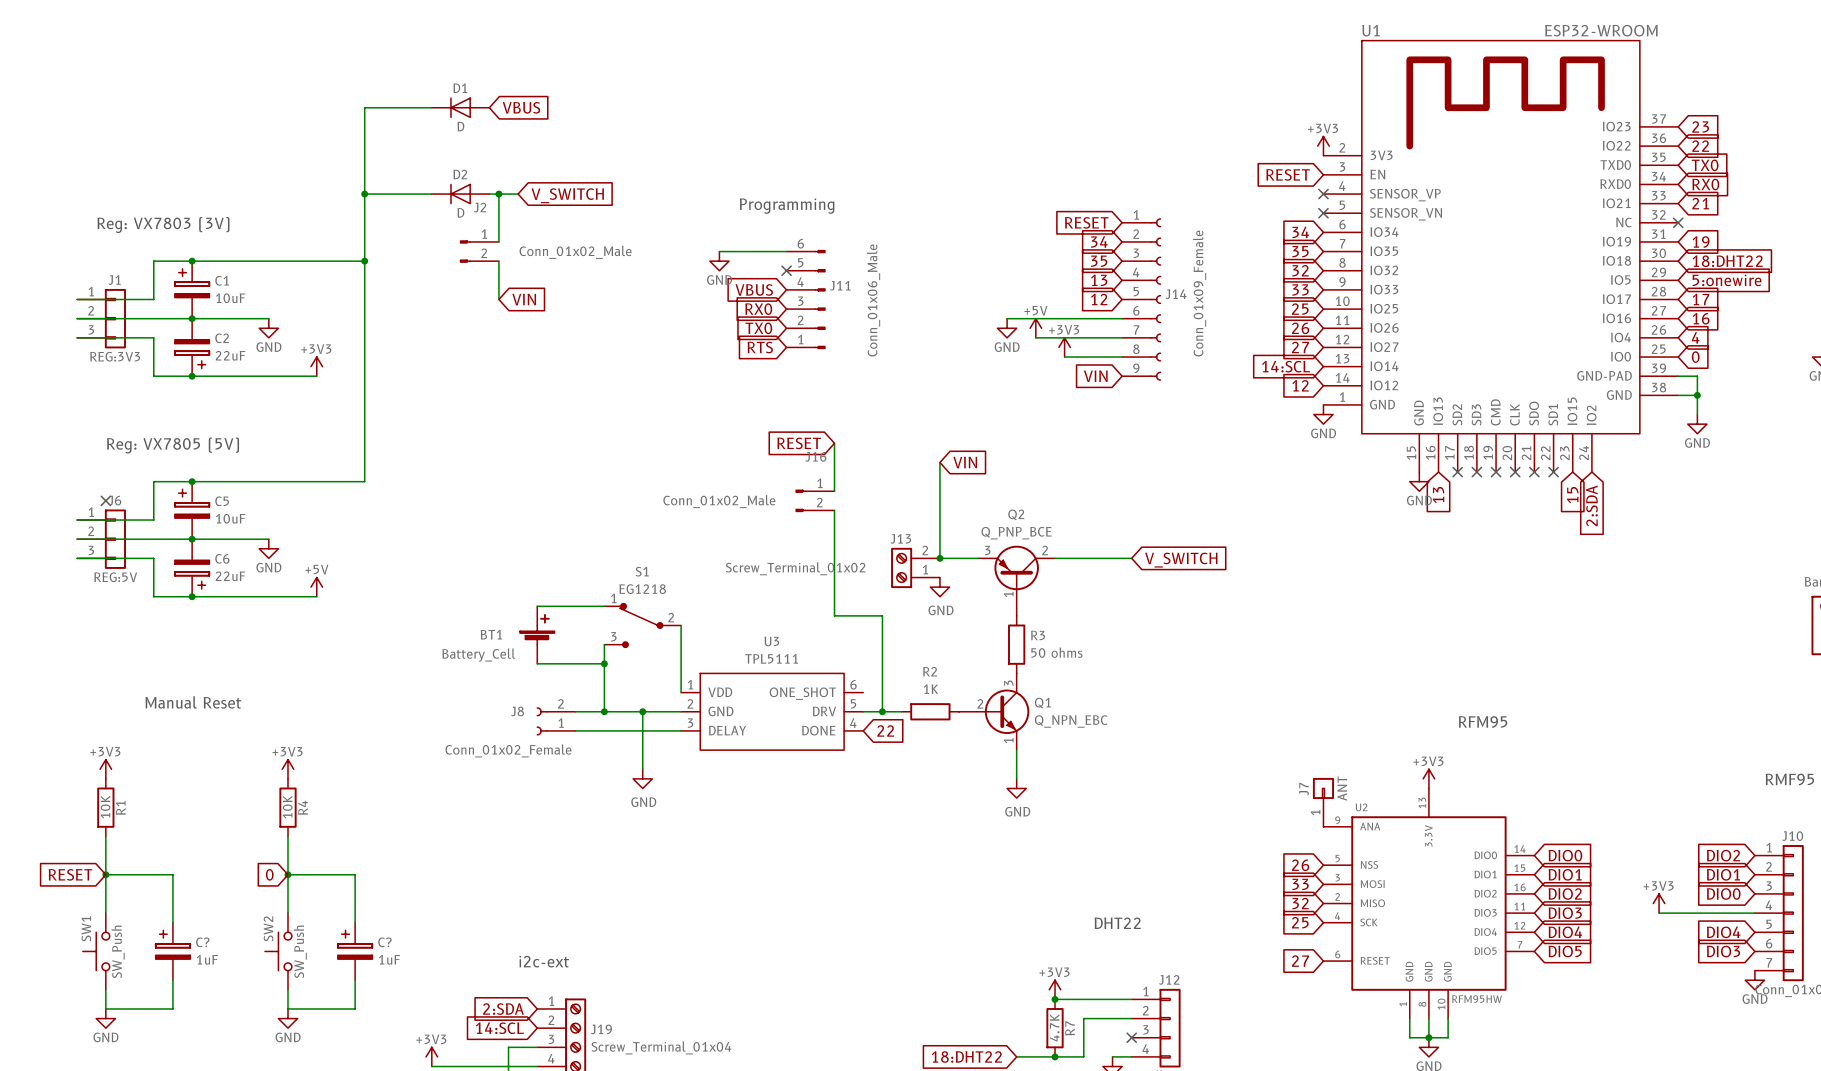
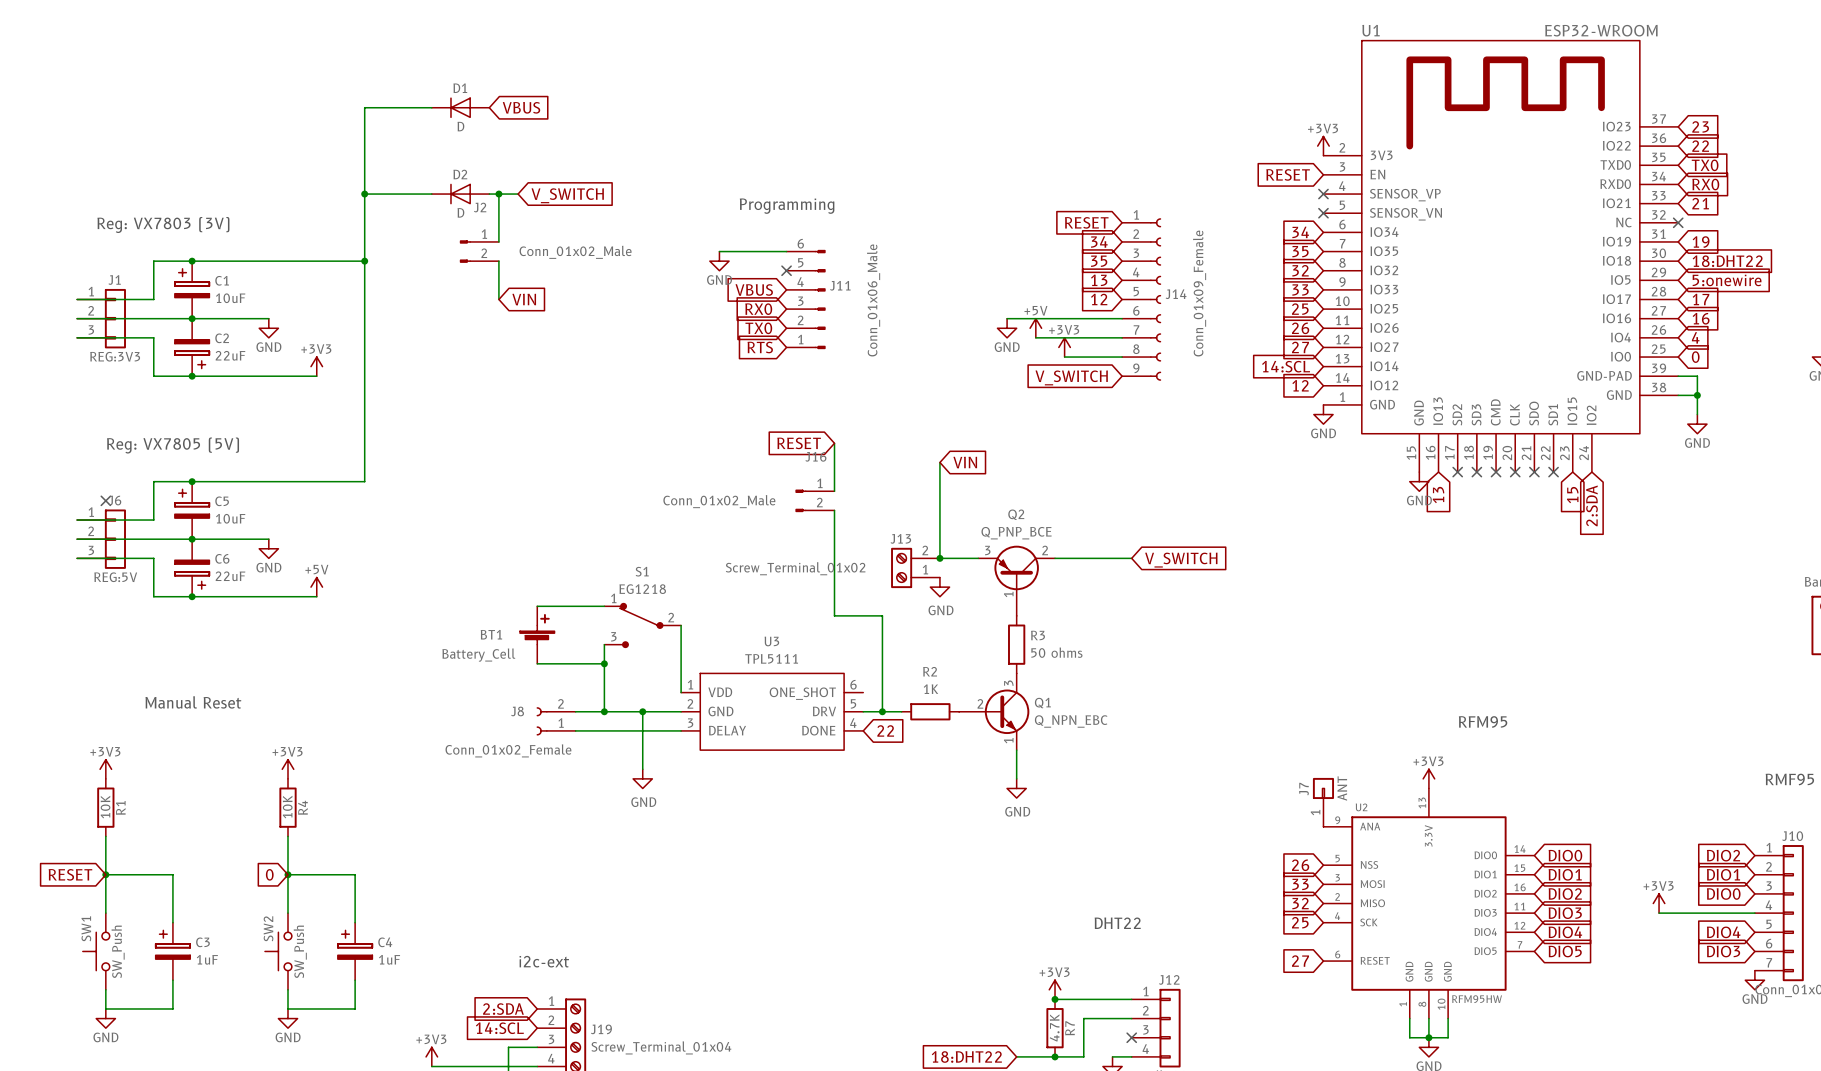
global label: VIN (1095, 376) -> V_SWITCH (1071, 377)
C? name: C? (202, 942) -> C3 (202, 942)
C? name: C? (384, 942) -> C4 (385, 942)

